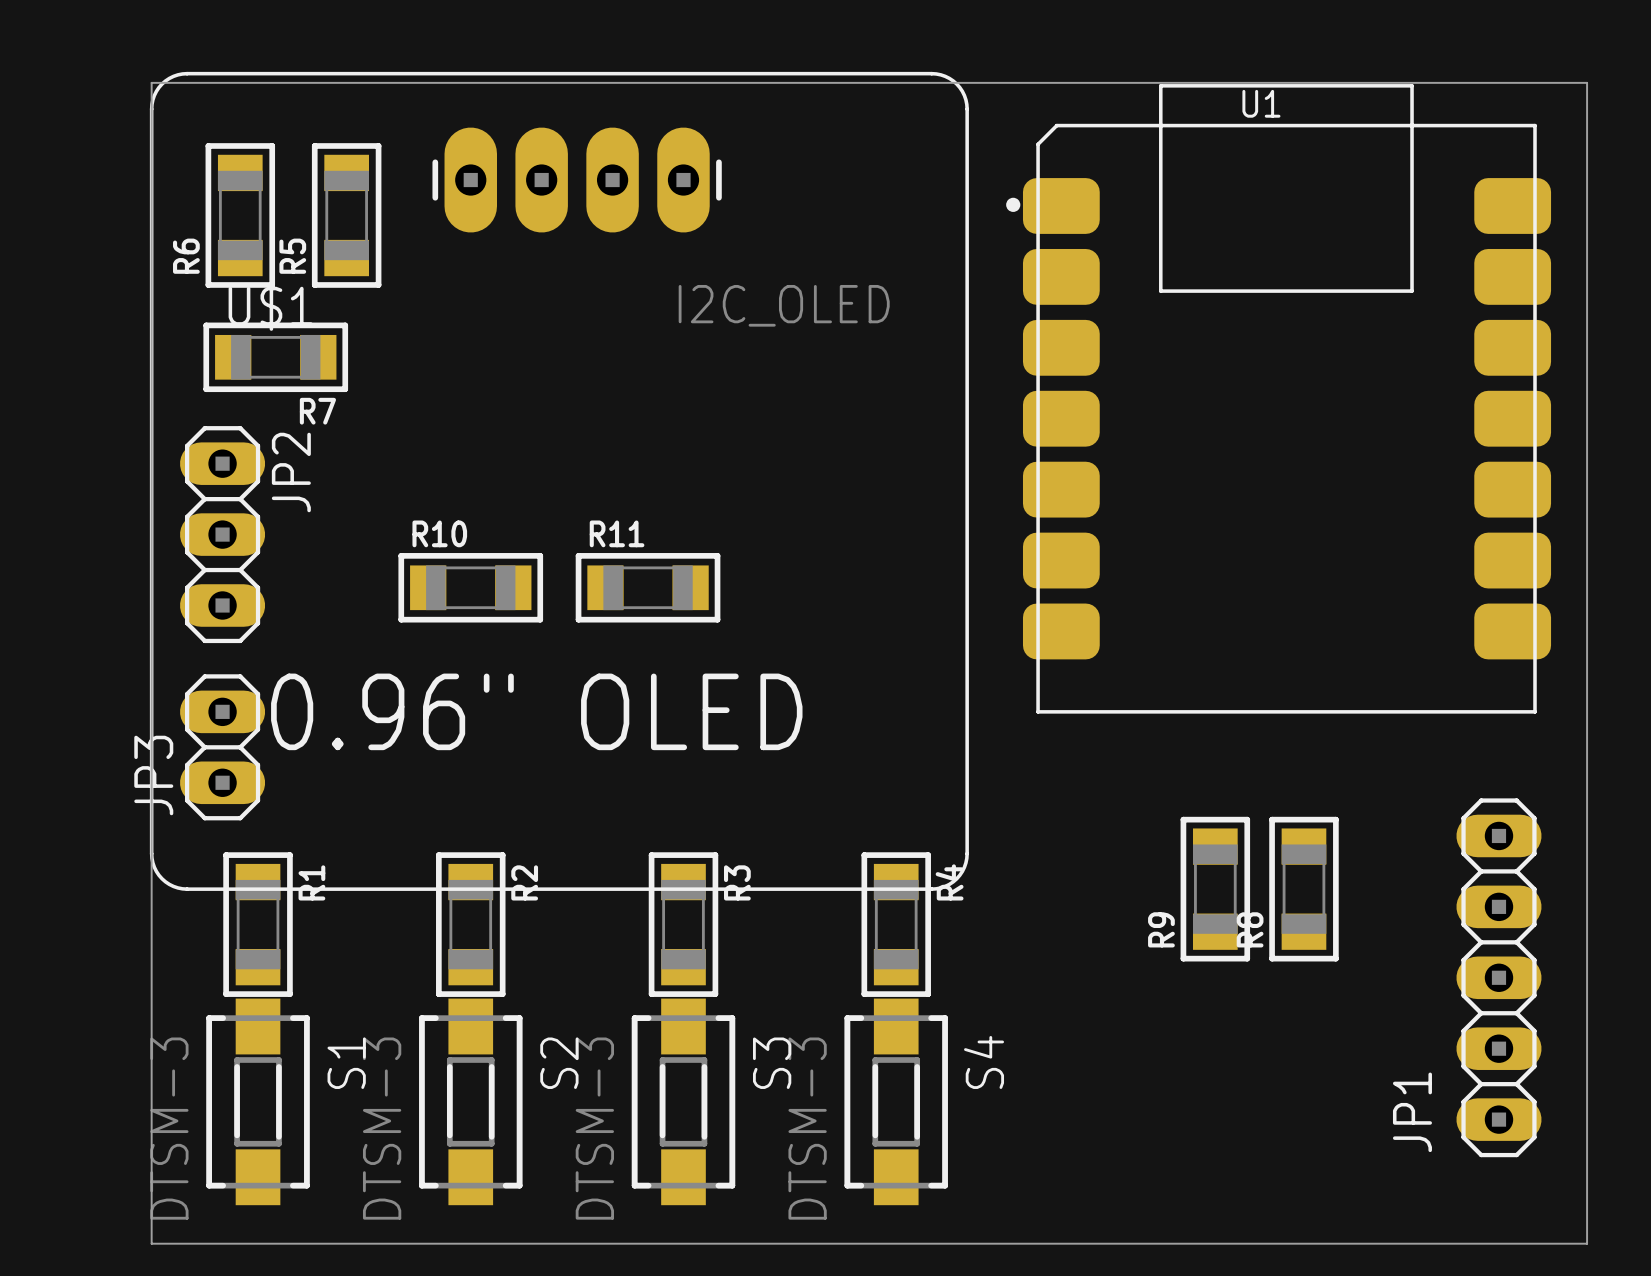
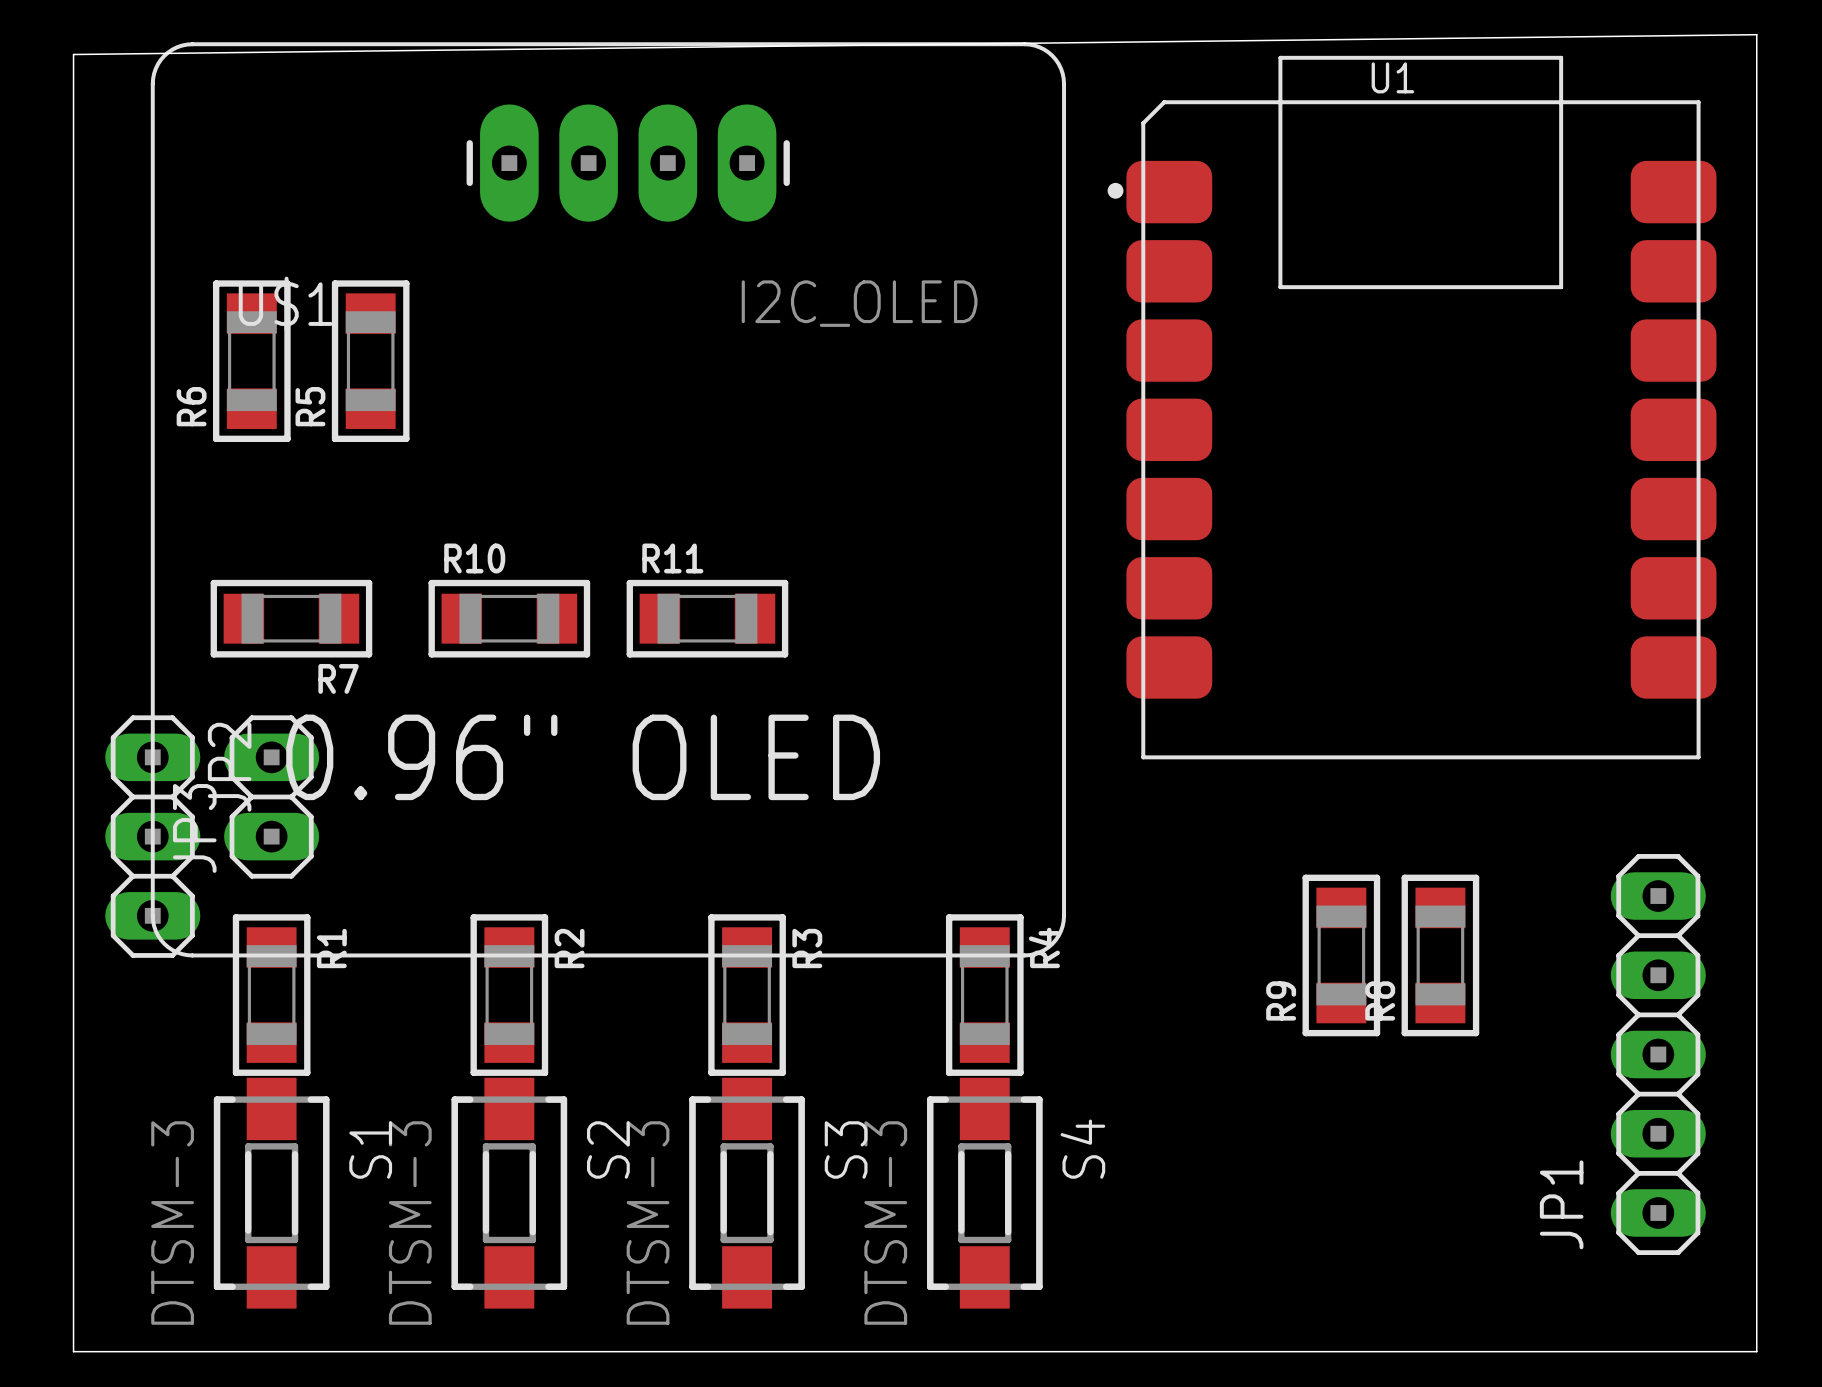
board edge: (1587, 82) (151, 82) (151, 1243) -> (1756, 54) (1756, 34) (73, 54) (73, 1351) (152, 1351)
R6 position: (240, 215) -> (251, 361)
R5 position: (346, 215) -> (370, 361)
R7 position: (275, 357) -> (291, 618)
JP2 position: (222, 534) -> (152, 836)
JP3 position: (222, 747) -> (271, 796)

